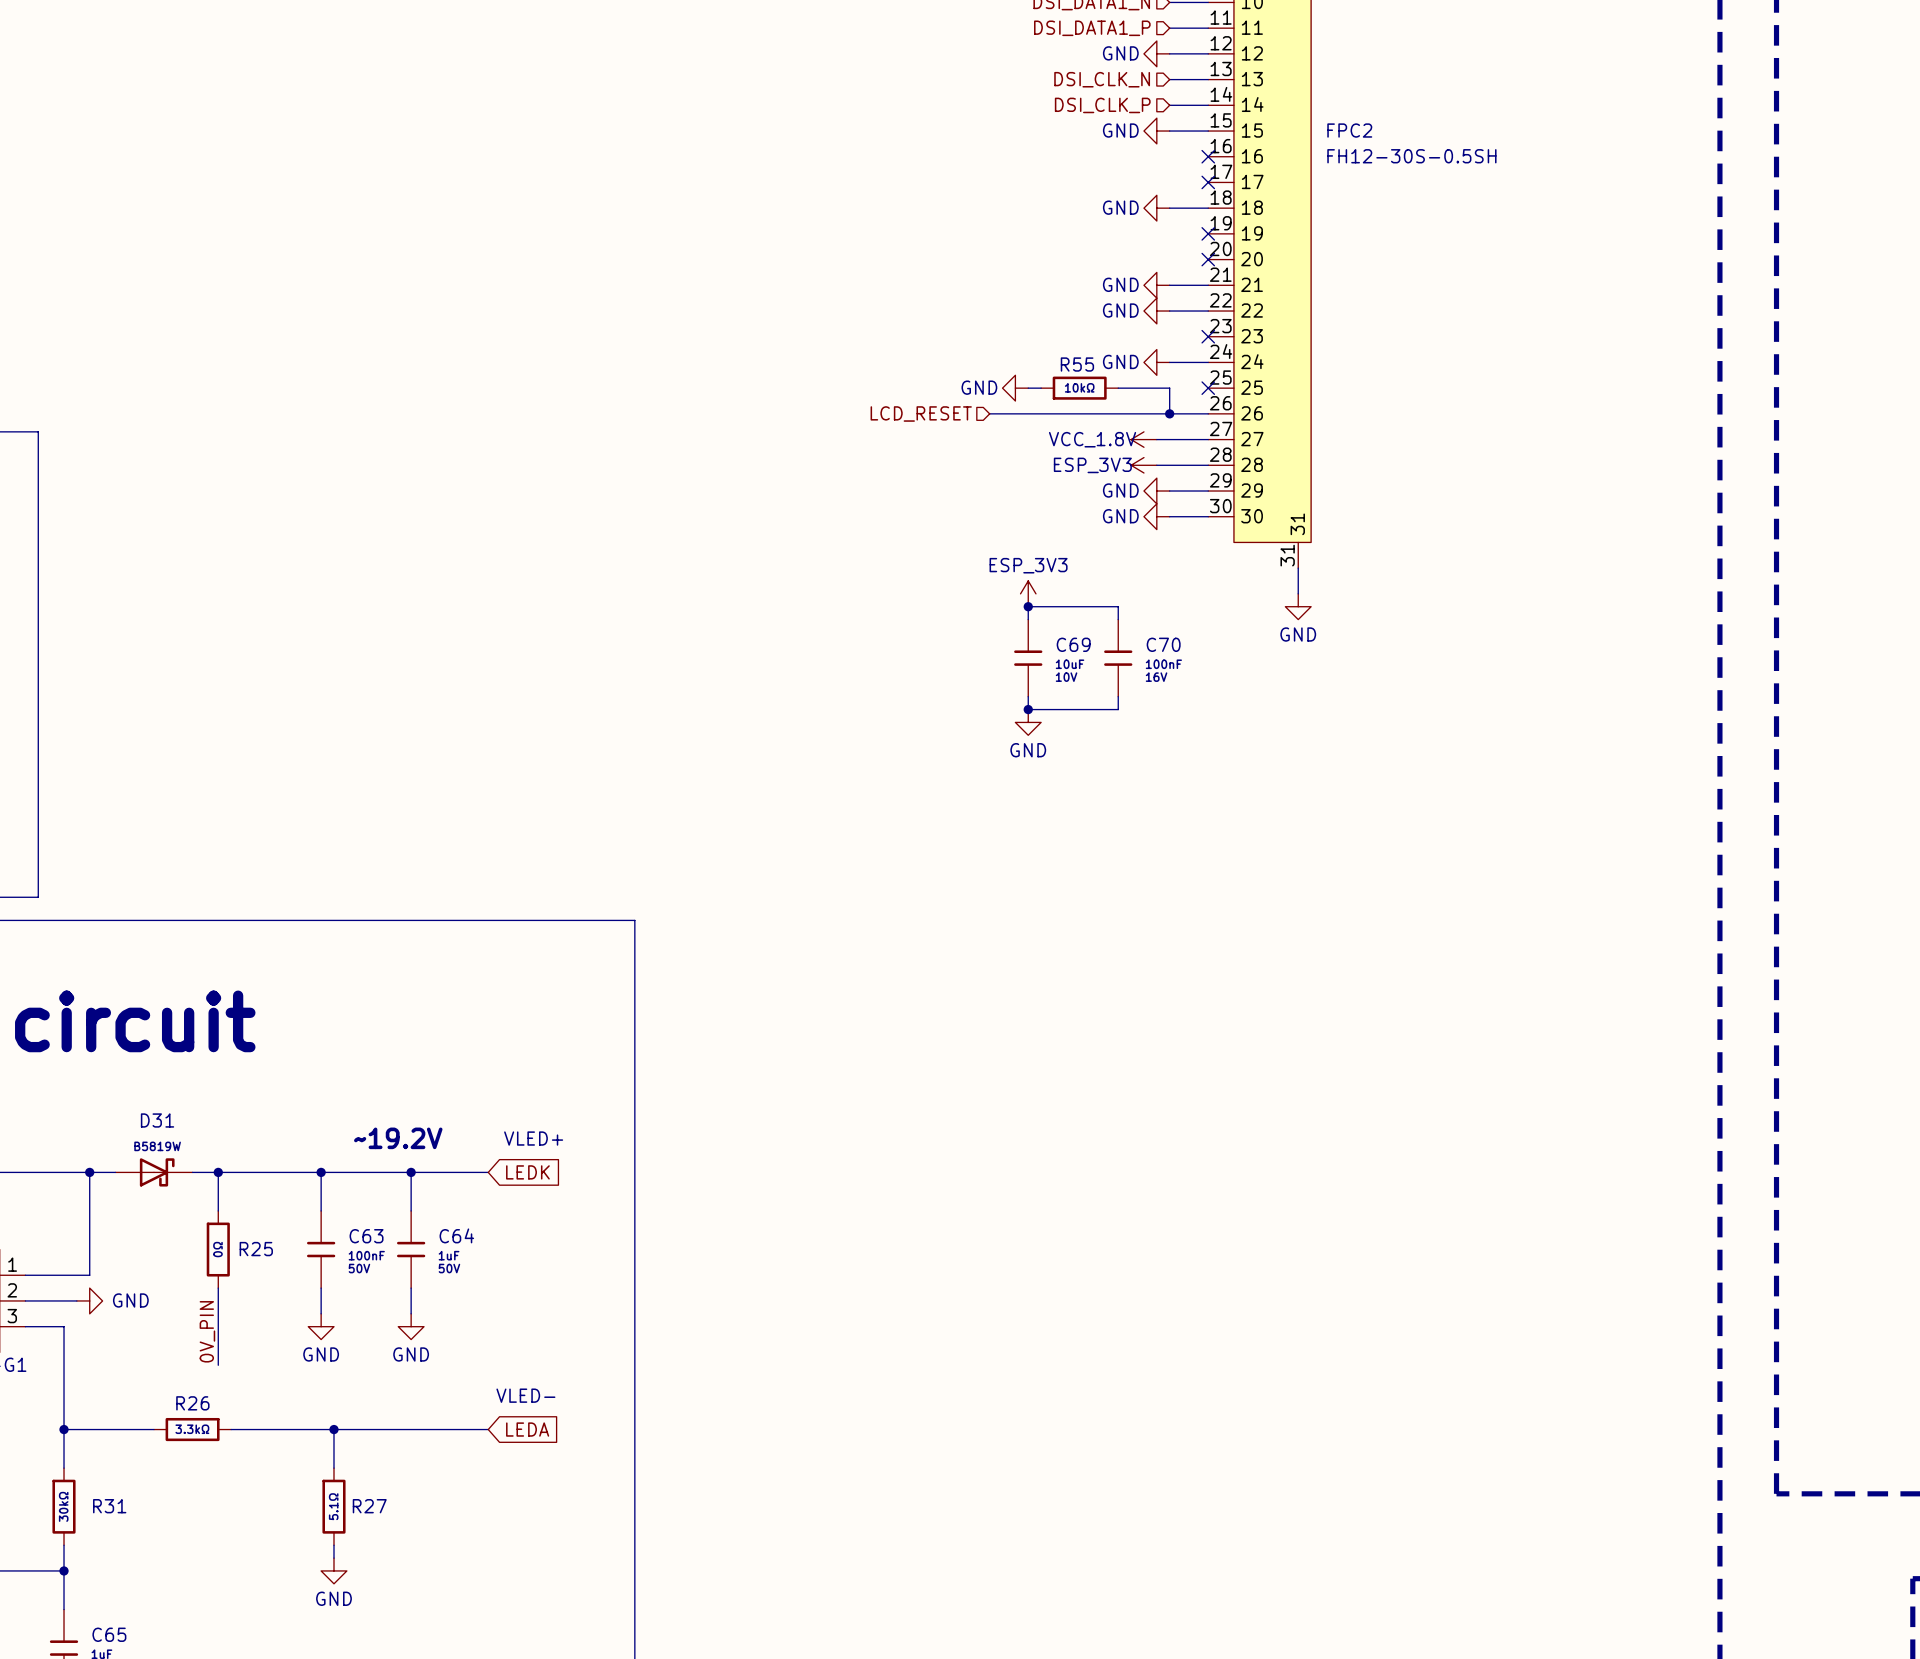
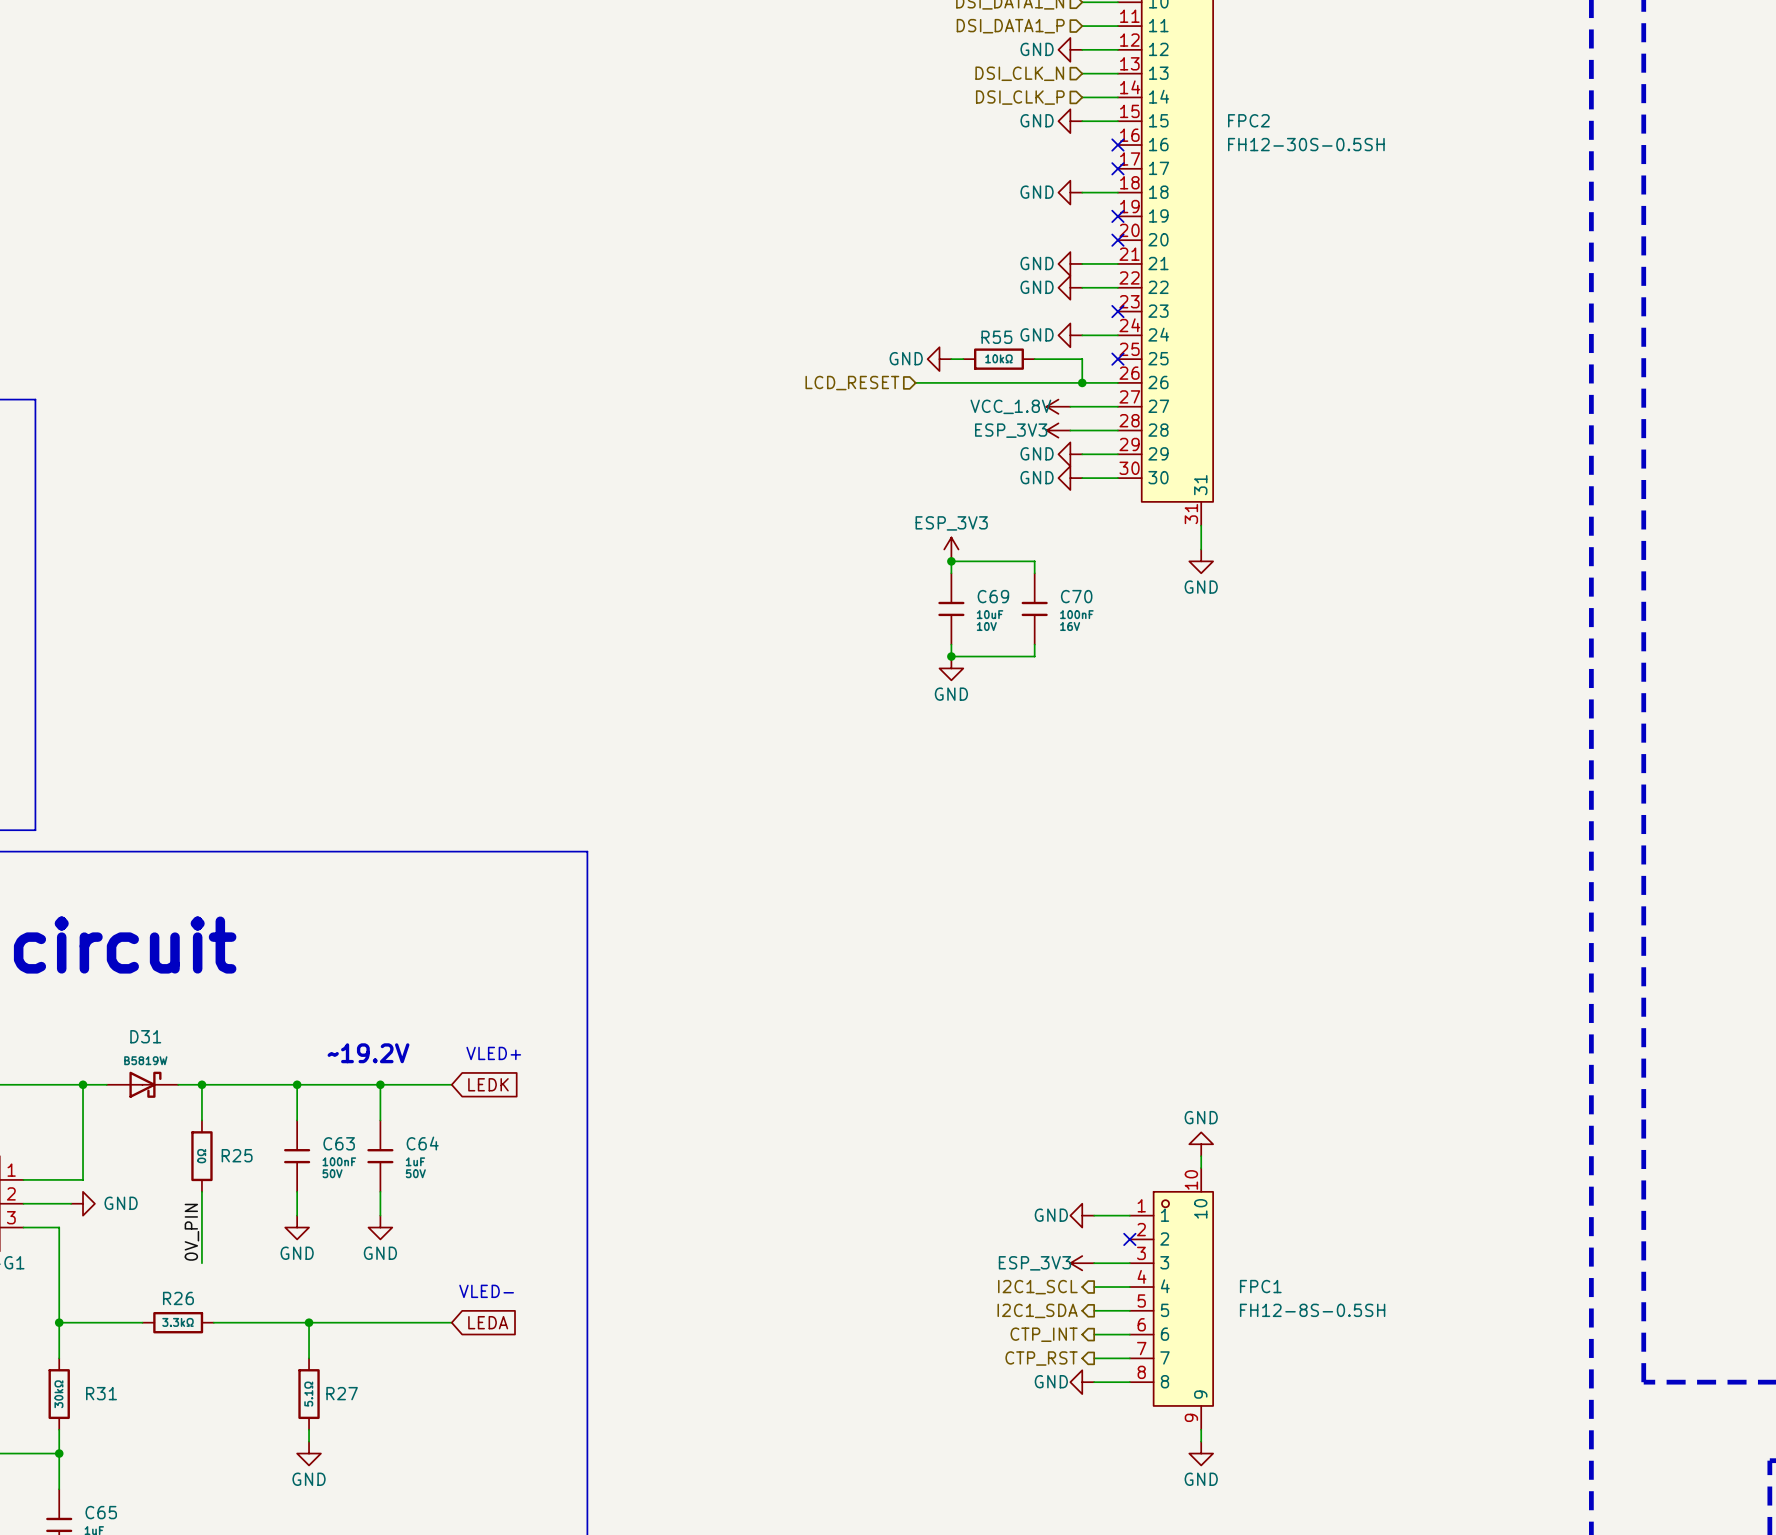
power symbol: none -> GND (1201, 1144)
wire: none -> (1201, 1156) (1201, 1168)
power symbol: none -> GND (1082, 1215)
wire: none -> (1094, 1215) (1129, 1215)
no-connect mark: none -> (1129, 1239)
power symbol: none -> ESP_3V3 (1082, 1263)
wire: none -> (1094, 1263) (1129, 1263)
wire: none -> (1094, 1287) (1129, 1287)
hierarchical label: none -> I2C1_SCL (1037, 1287)
FPC1: none -> FH12-8S-0.5SH (1171, 1298)
hierarchical label: none -> I2C1_SDA (1037, 1310)
wire: none -> (1094, 1310) (1129, 1310)
hierarchical label: none -> CTP_INT (1044, 1334)
wire: none -> (1094, 1334) (1129, 1334)
hierarchical label: none -> CTP_RST (1041, 1358)
wire: none -> (1094, 1358) (1129, 1358)
power symbol: none -> GND (1082, 1382)
wire: none -> (1094, 1382) (1129, 1382)
wire: none -> (1201, 1429) (1201, 1441)
power symbol: none -> GND (1201, 1453)

